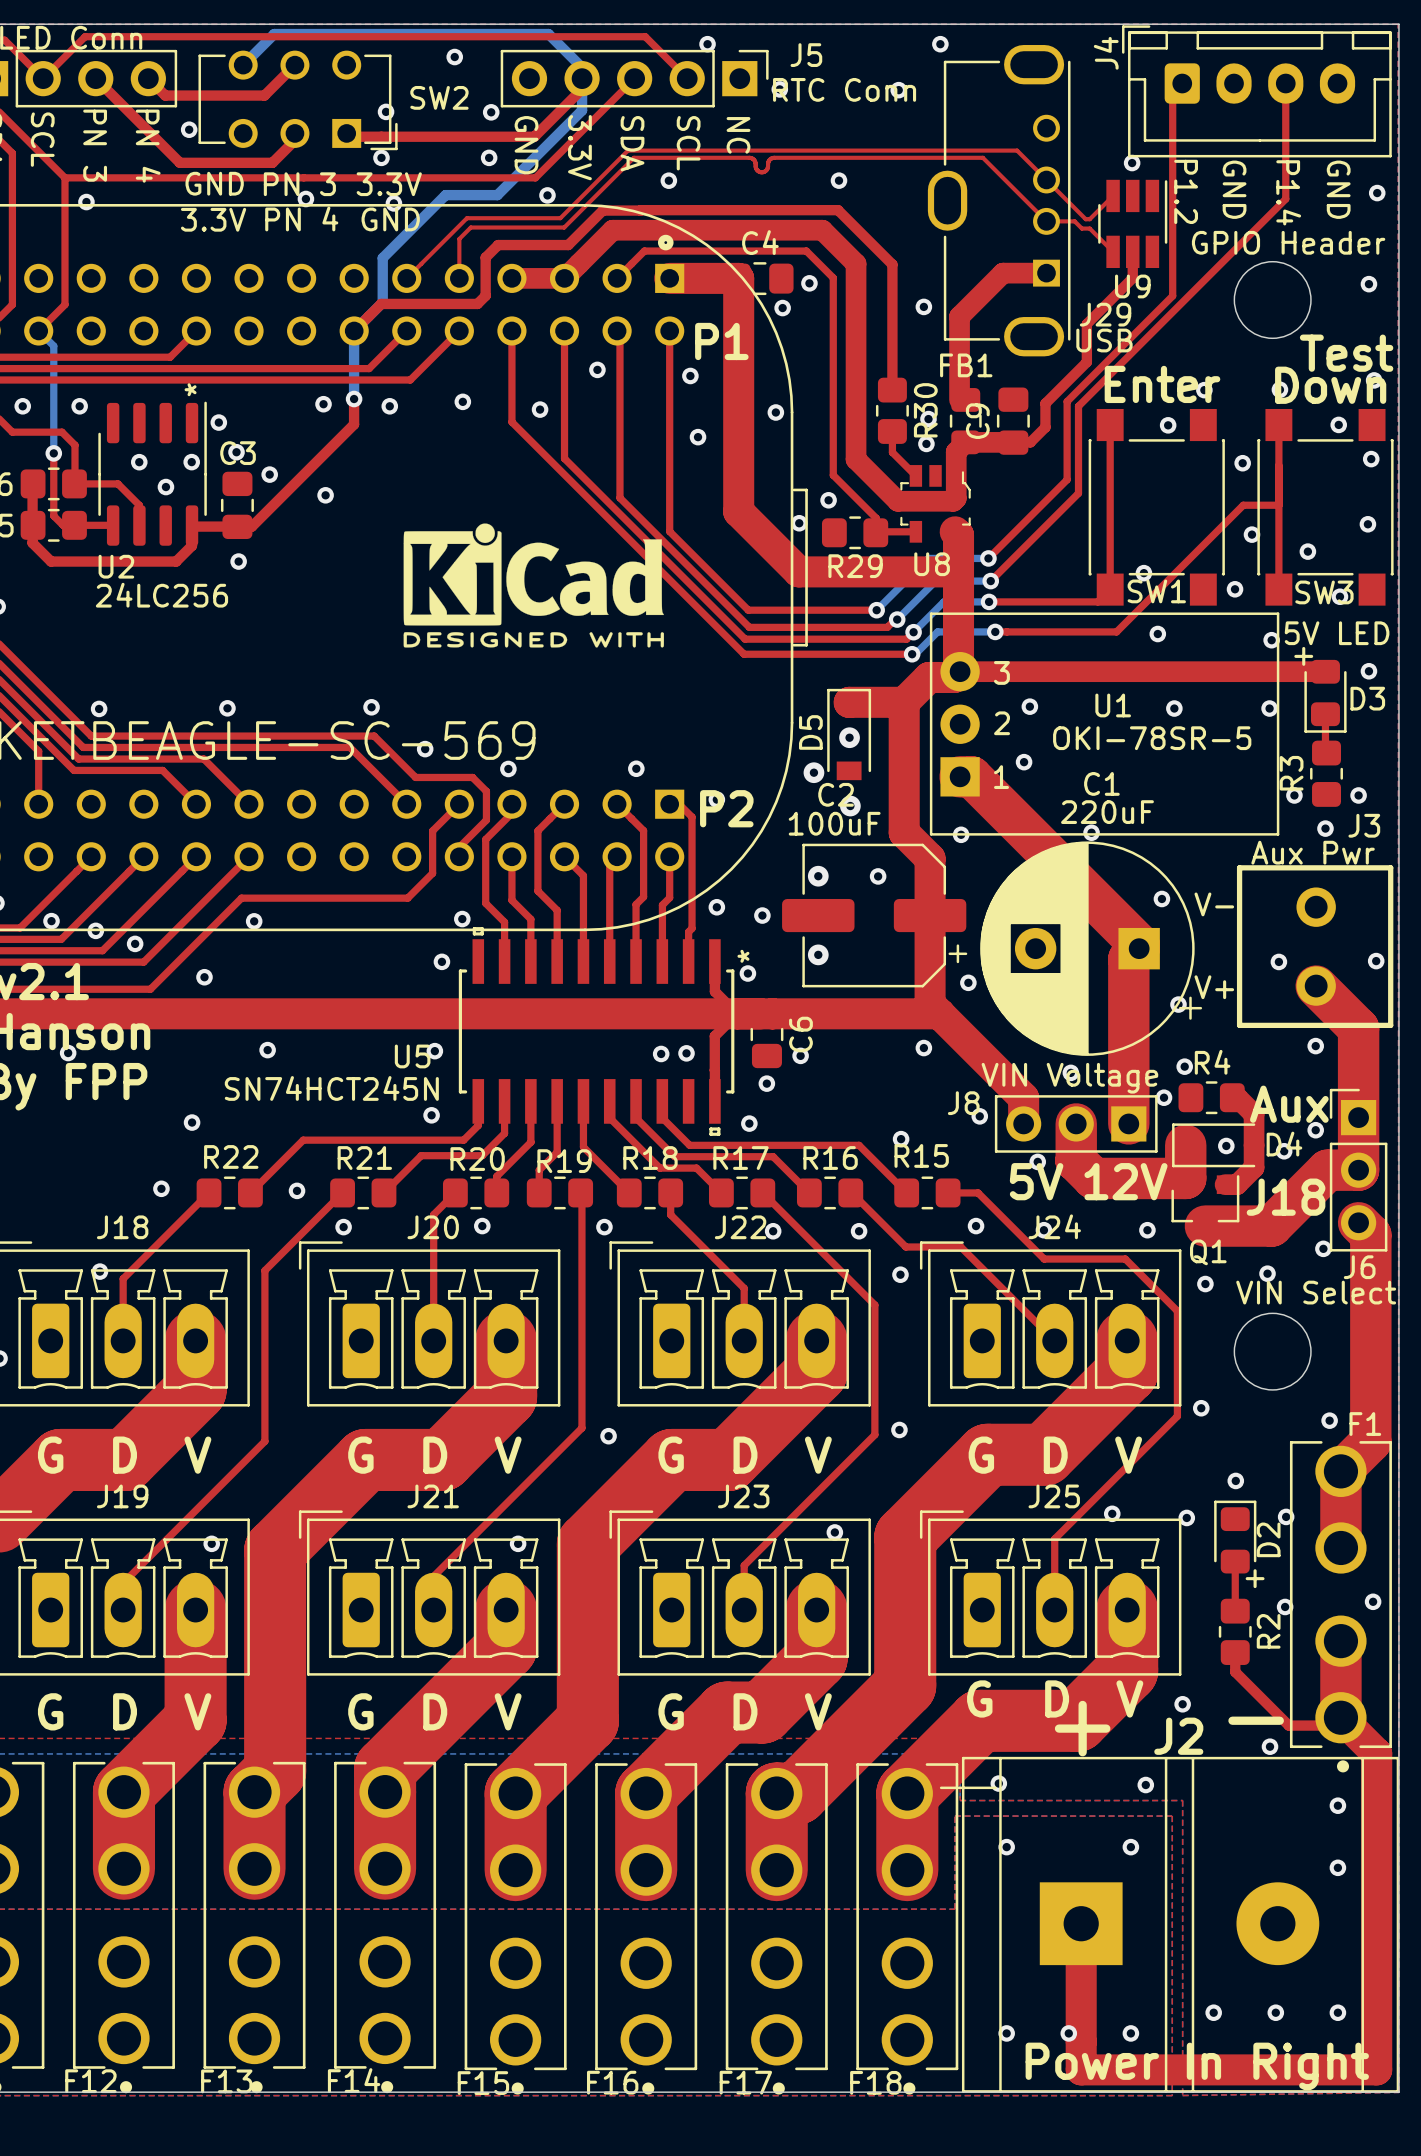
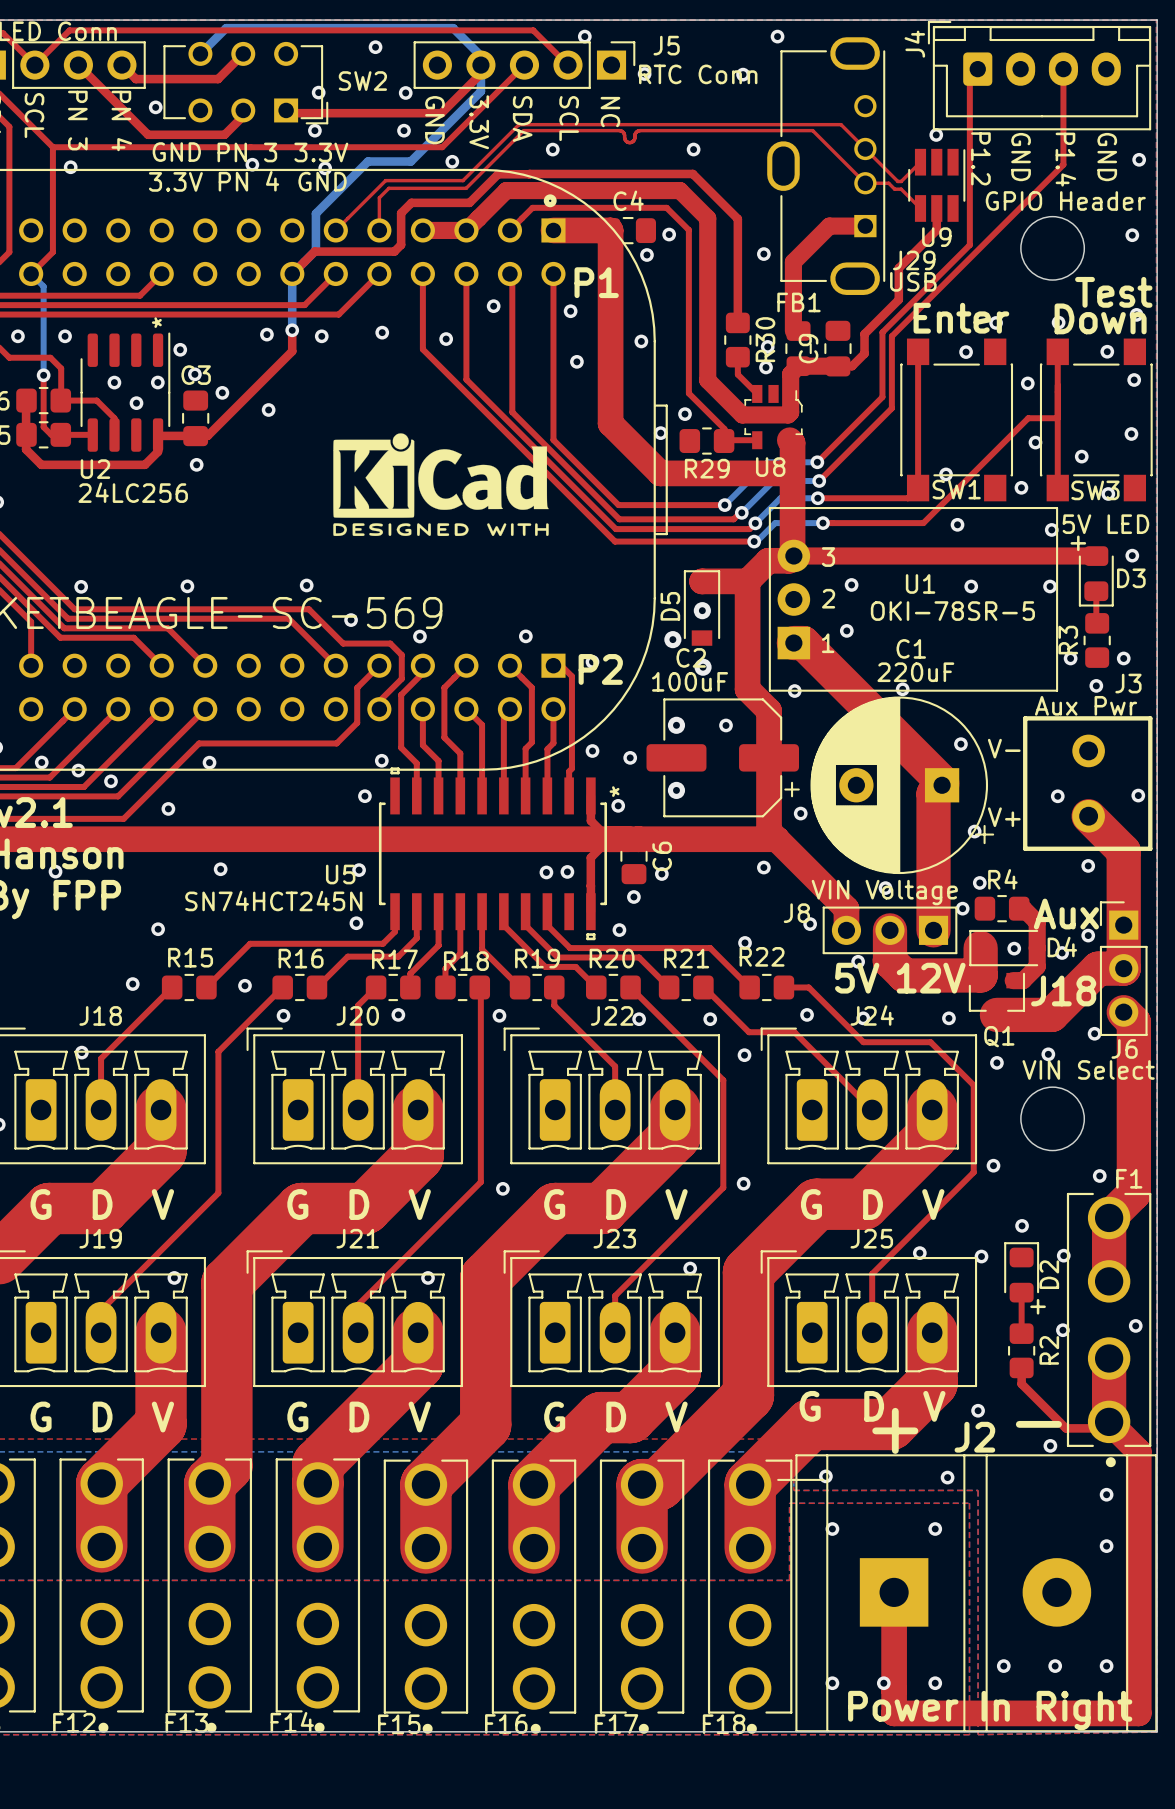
R15 name: R15 (921, 1155) -> R22 (762, 956)
R22 name: R22 (231, 1156) -> R15 (190, 957)
R21 name: R21 (364, 1158) -> R16 (301, 958)
R18 name: R18 (650, 1158) -> R19 (537, 958)
R17 name: R17 (741, 1158) -> R20 (612, 958)
R16 name: R16 (830, 1158) -> R21 (686, 958)
R20 name: R20 (477, 1159) -> R17 (394, 959)
R19 name: R19 (564, 1161) -> R18 (466, 961)

